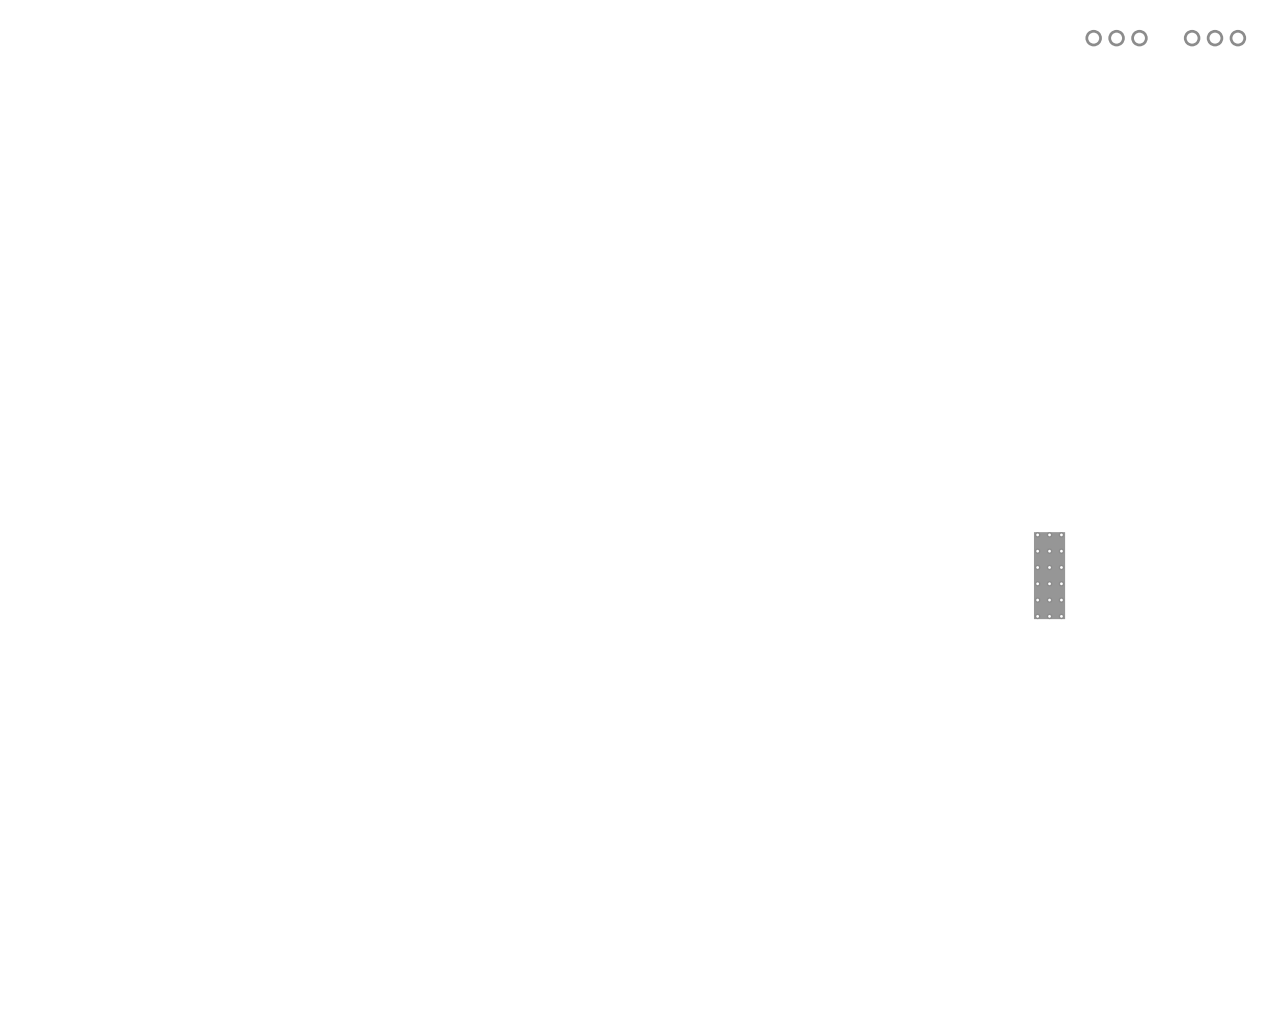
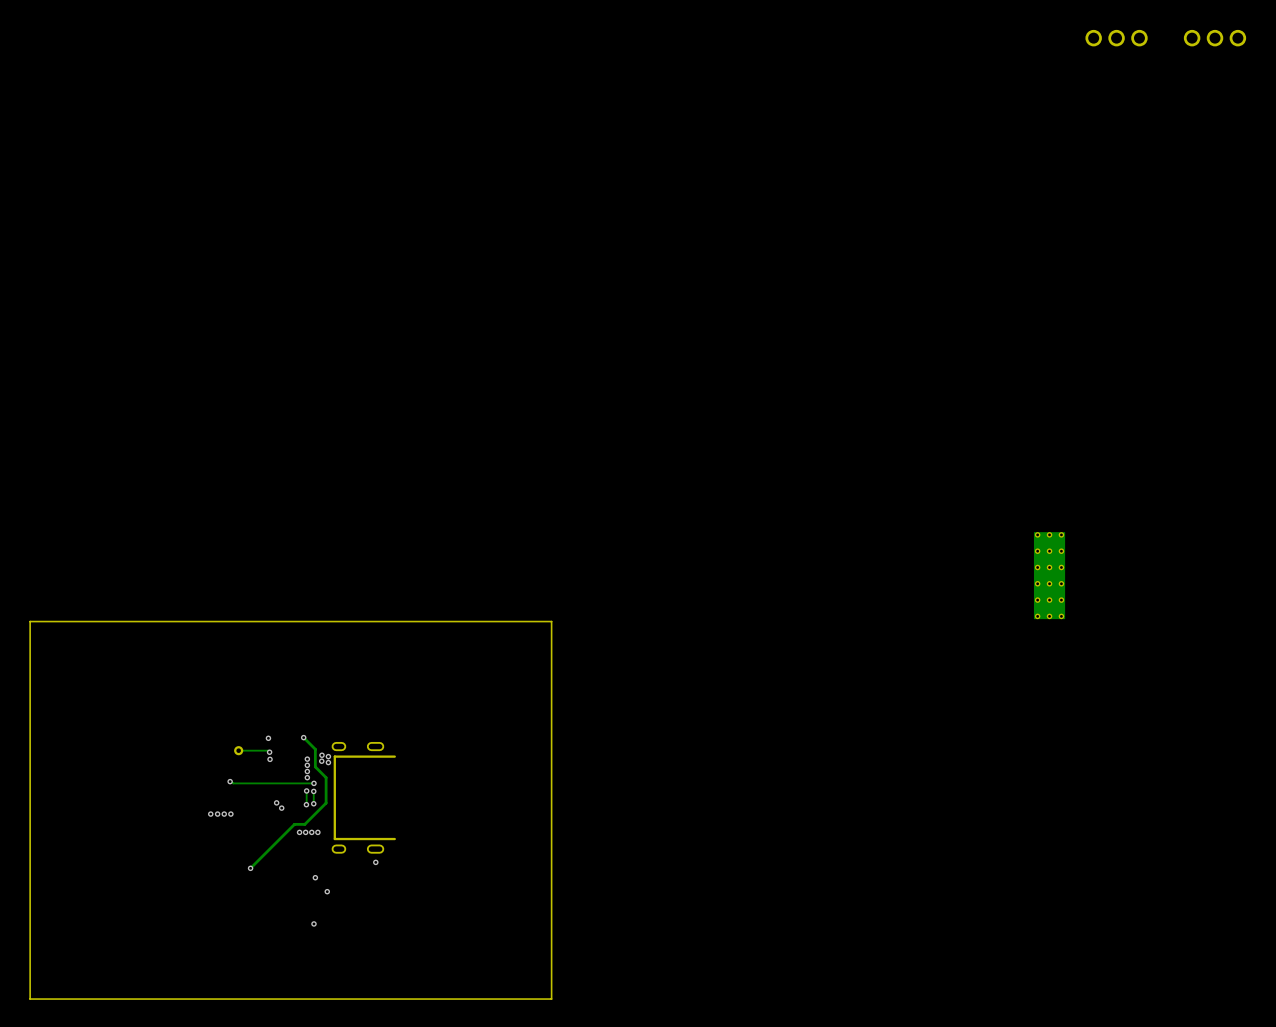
board edge: none -> (551, 621) (30, 621) (30, 999) (551, 999) (551, 621)
track: none -> (303, 737) (315, 749) (315, 766) (326, 777) (326, 803) (304, 824) (294, 824) (250, 868)
via: none -> (303, 737)
via: none -> (268, 738)
track: none -> (238, 750) (269, 752)
part: none -> (238, 750)
via: none -> (269, 752)
via: none -> (321, 755)
via: none -> (328, 756)
via: none -> (270, 759)
via: none -> (307, 759)
via: none -> (321, 761)
via: none -> (328, 762)
via: none -> (307, 765)
via: none -> (307, 771)
via: none -> (307, 777)
track: none -> (230, 781) (233, 783) (313, 782)
via: none -> (230, 781)
via: none -> (313, 783)
track: none -> (306, 790) (306, 804)
via: none -> (306, 790)
track: none -> (313, 791) (313, 803)
via: none -> (313, 791)
part: none -> (363, 797)
via: none -> (276, 802)
via: none -> (313, 803)
via: none -> (306, 804)
via: none -> (281, 808)
via: none -> (210, 814)
via: none -> (217, 814)
via: none -> (224, 814)
via: none -> (230, 814)
via: none -> (299, 832)
via: none -> (305, 832)
via: none -> (311, 832)
via: none -> (317, 832)
via: none -> (375, 862)
via: none -> (250, 868)
via: none -> (315, 877)
via: none -> (327, 891)
via: none -> (313, 923)

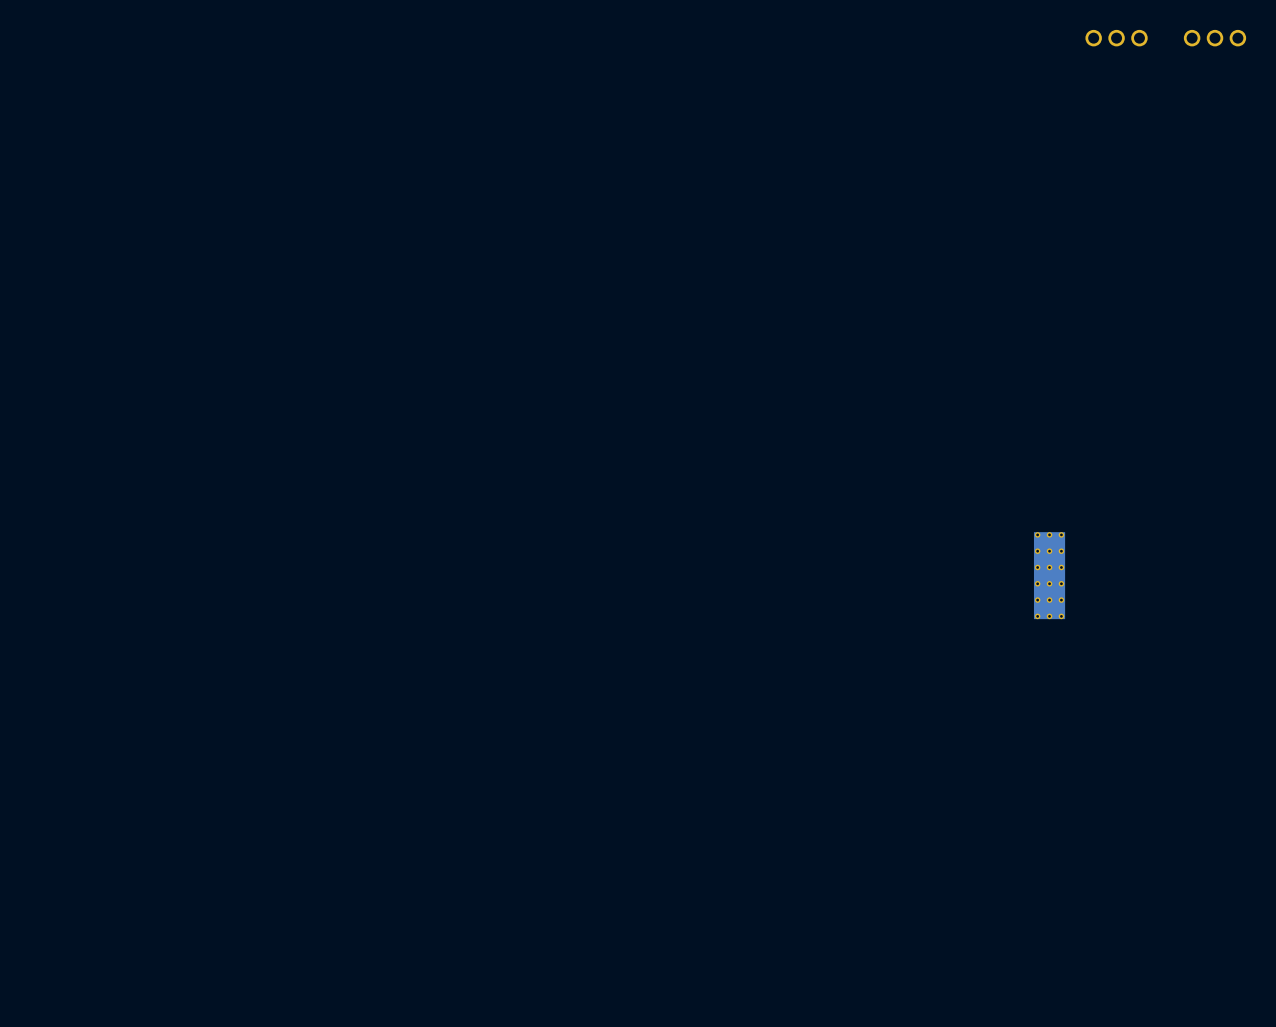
board edge: (551, 621) (30, 621) (30, 999) (551, 999) (551, 621) -> none
track: (303, 737) (315, 749) (315, 766) (326, 777) (326, 803) (304, 824) (294, 824) (250, 868) -> none
via: (303, 737) -> none
via: (268, 738) -> none
track: (238, 750) (269, 752) -> none
part: (238, 750) -> none
via: (269, 752) -> none
via: (321, 755) -> none
via: (328, 756) -> none
via: (270, 759) -> none
via: (307, 759) -> none
via: (321, 761) -> none
via: (328, 762) -> none
via: (307, 765) -> none
via: (307, 771) -> none
via: (307, 777) -> none
track: (230, 781) (233, 783) (313, 782) -> none
via: (230, 781) -> none
via: (313, 783) -> none
track: (306, 790) (306, 804) -> none
via: (306, 790) -> none
track: (313, 791) (313, 803) -> none
via: (313, 791) -> none
part: (363, 797) -> none
via: (276, 802) -> none
via: (313, 803) -> none
via: (306, 804) -> none
via: (281, 808) -> none
via: (210, 814) -> none
via: (217, 814) -> none
via: (224, 814) -> none
via: (230, 814) -> none
via: (299, 832) -> none
via: (305, 832) -> none
via: (311, 832) -> none
via: (317, 832) -> none
via: (375, 862) -> none
via: (250, 868) -> none
via: (315, 877) -> none
via: (327, 891) -> none
via: (313, 923) -> none

